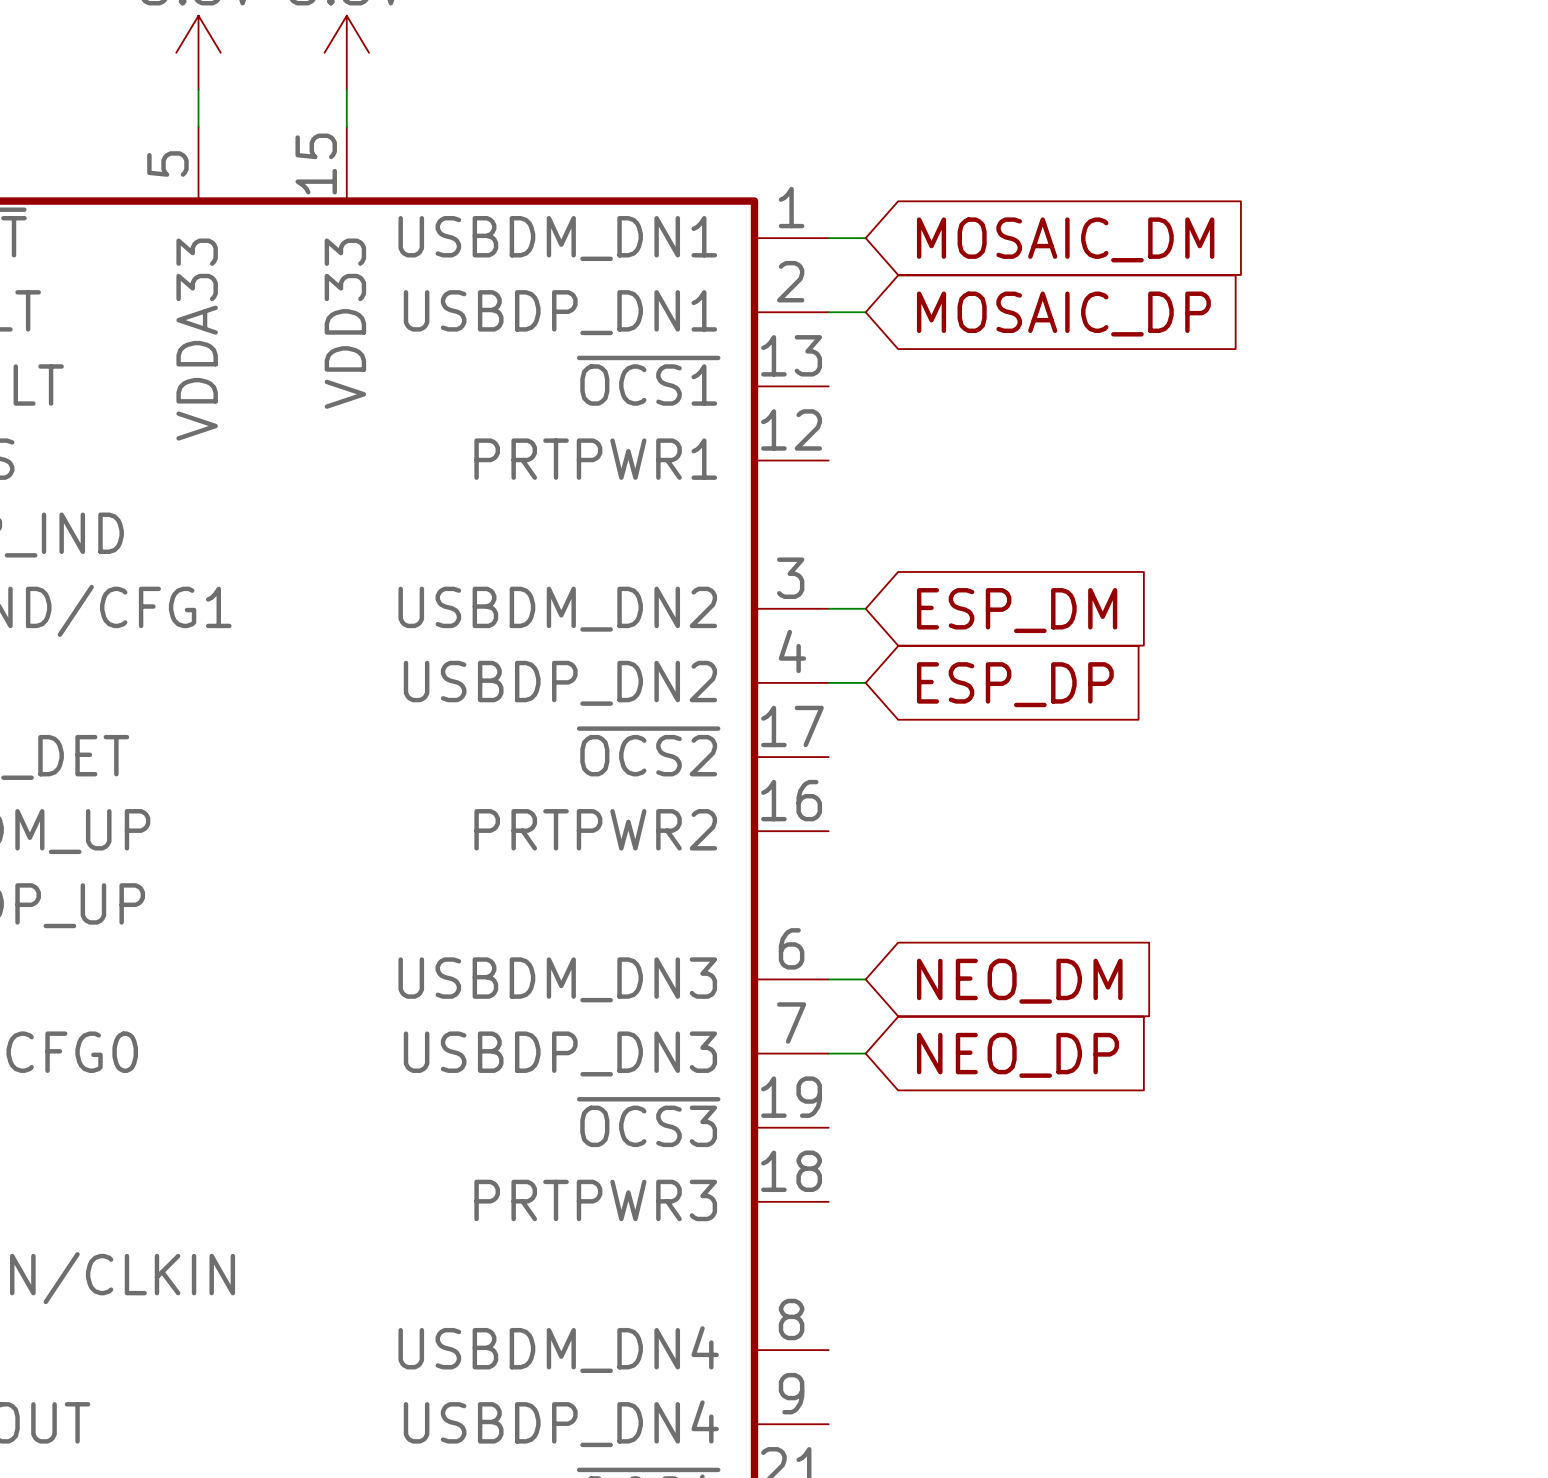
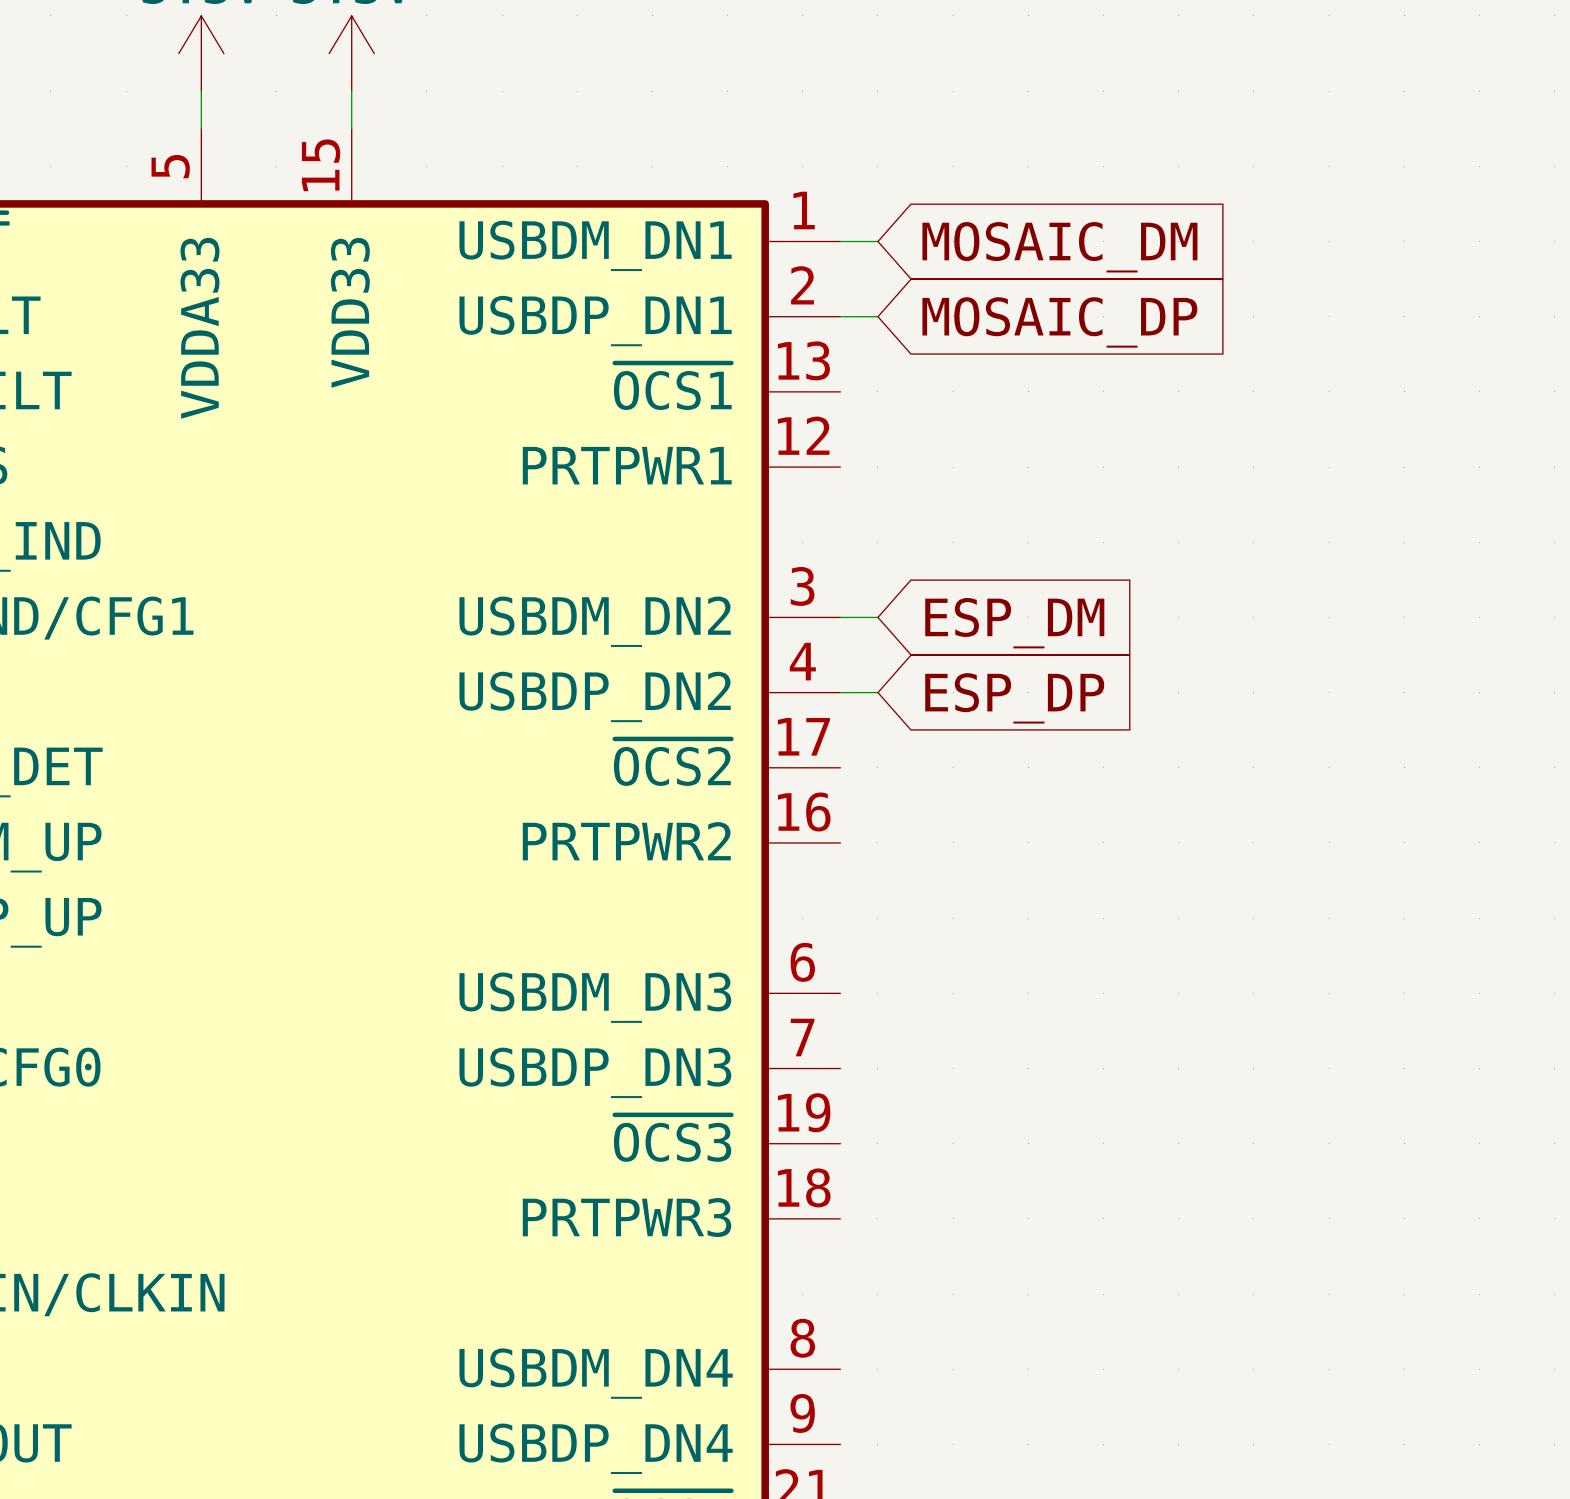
wire: (828, 979) (865, 979) -> none
global label: NEO_DM (1019, 981) -> none
wire: (828, 1053) (865, 1053) -> none
global label: NEO_DP (1017, 1055) -> none

